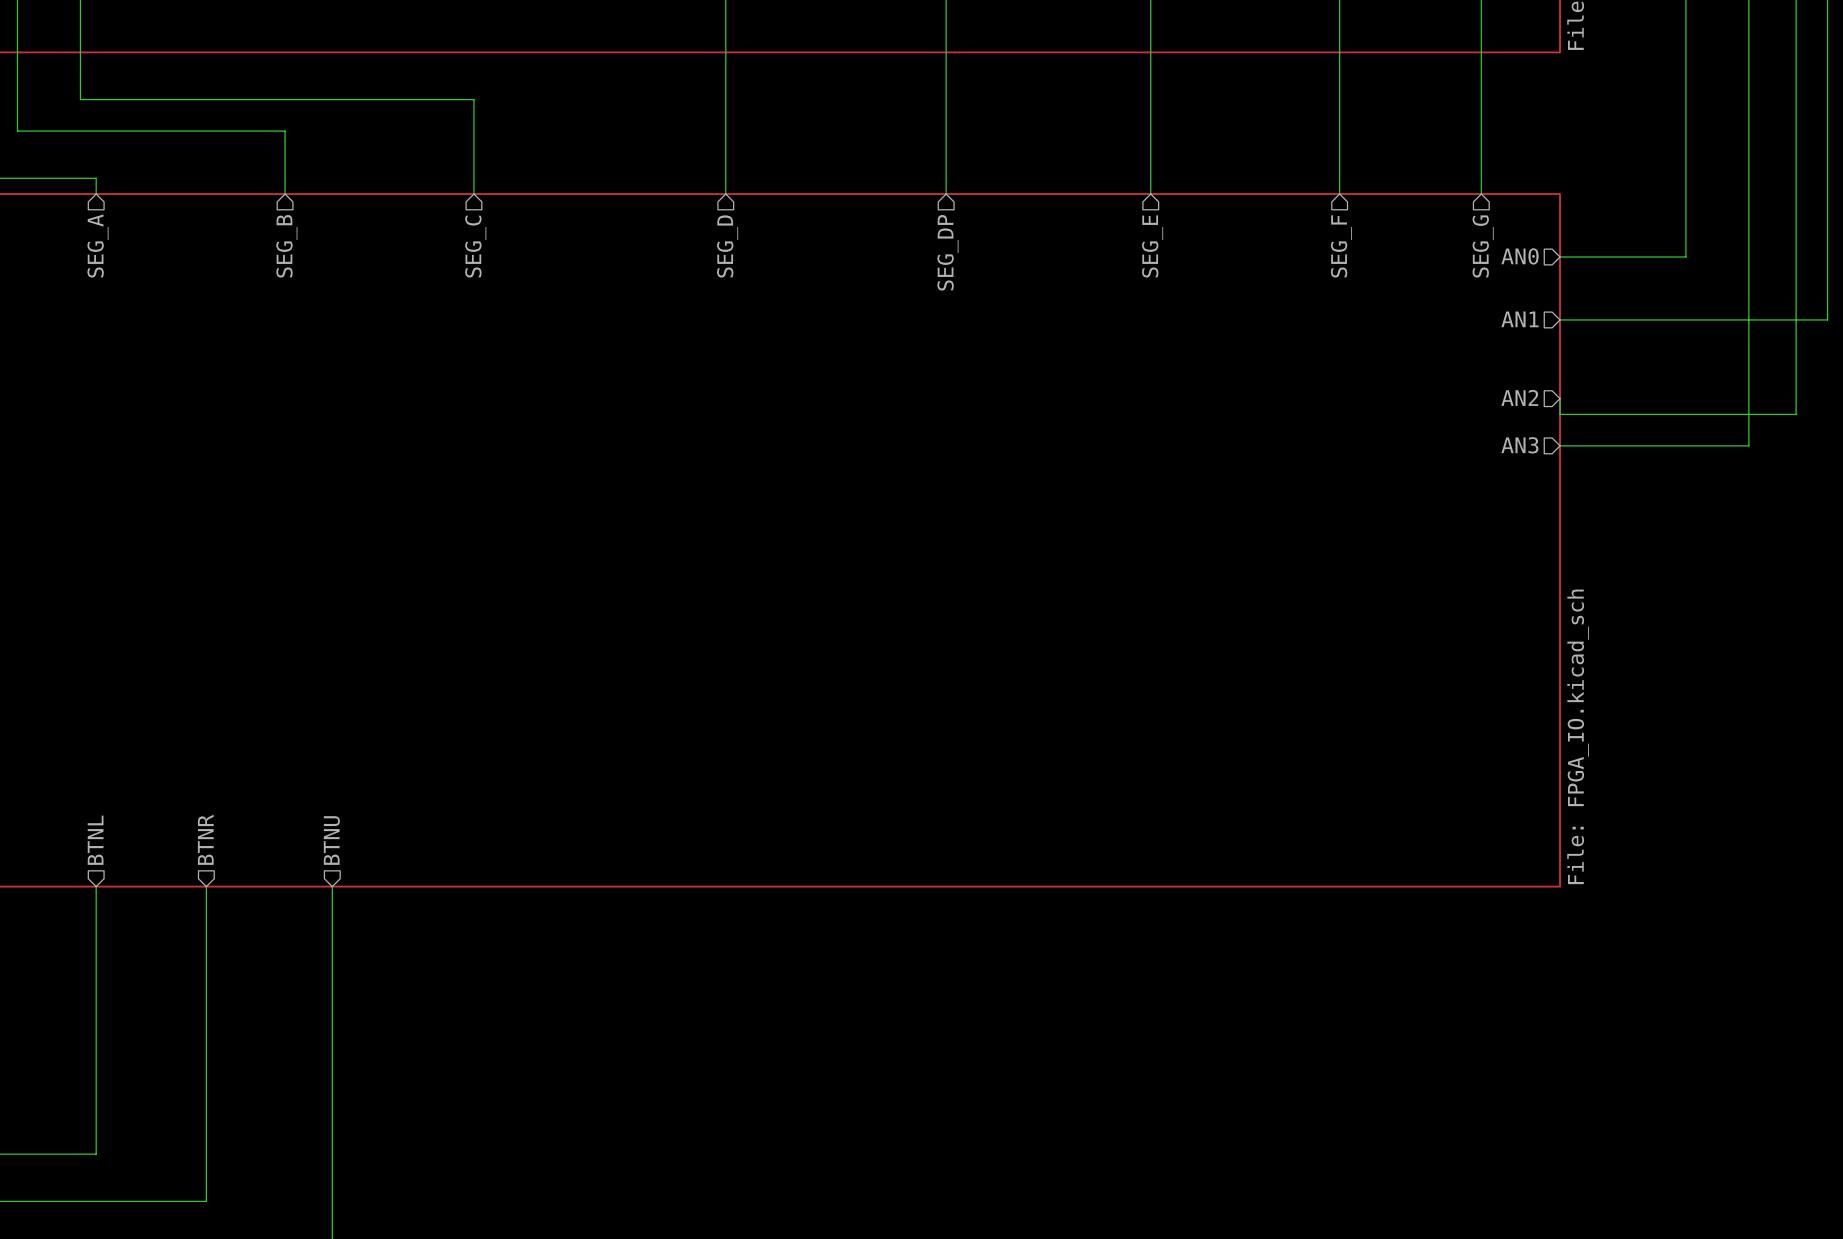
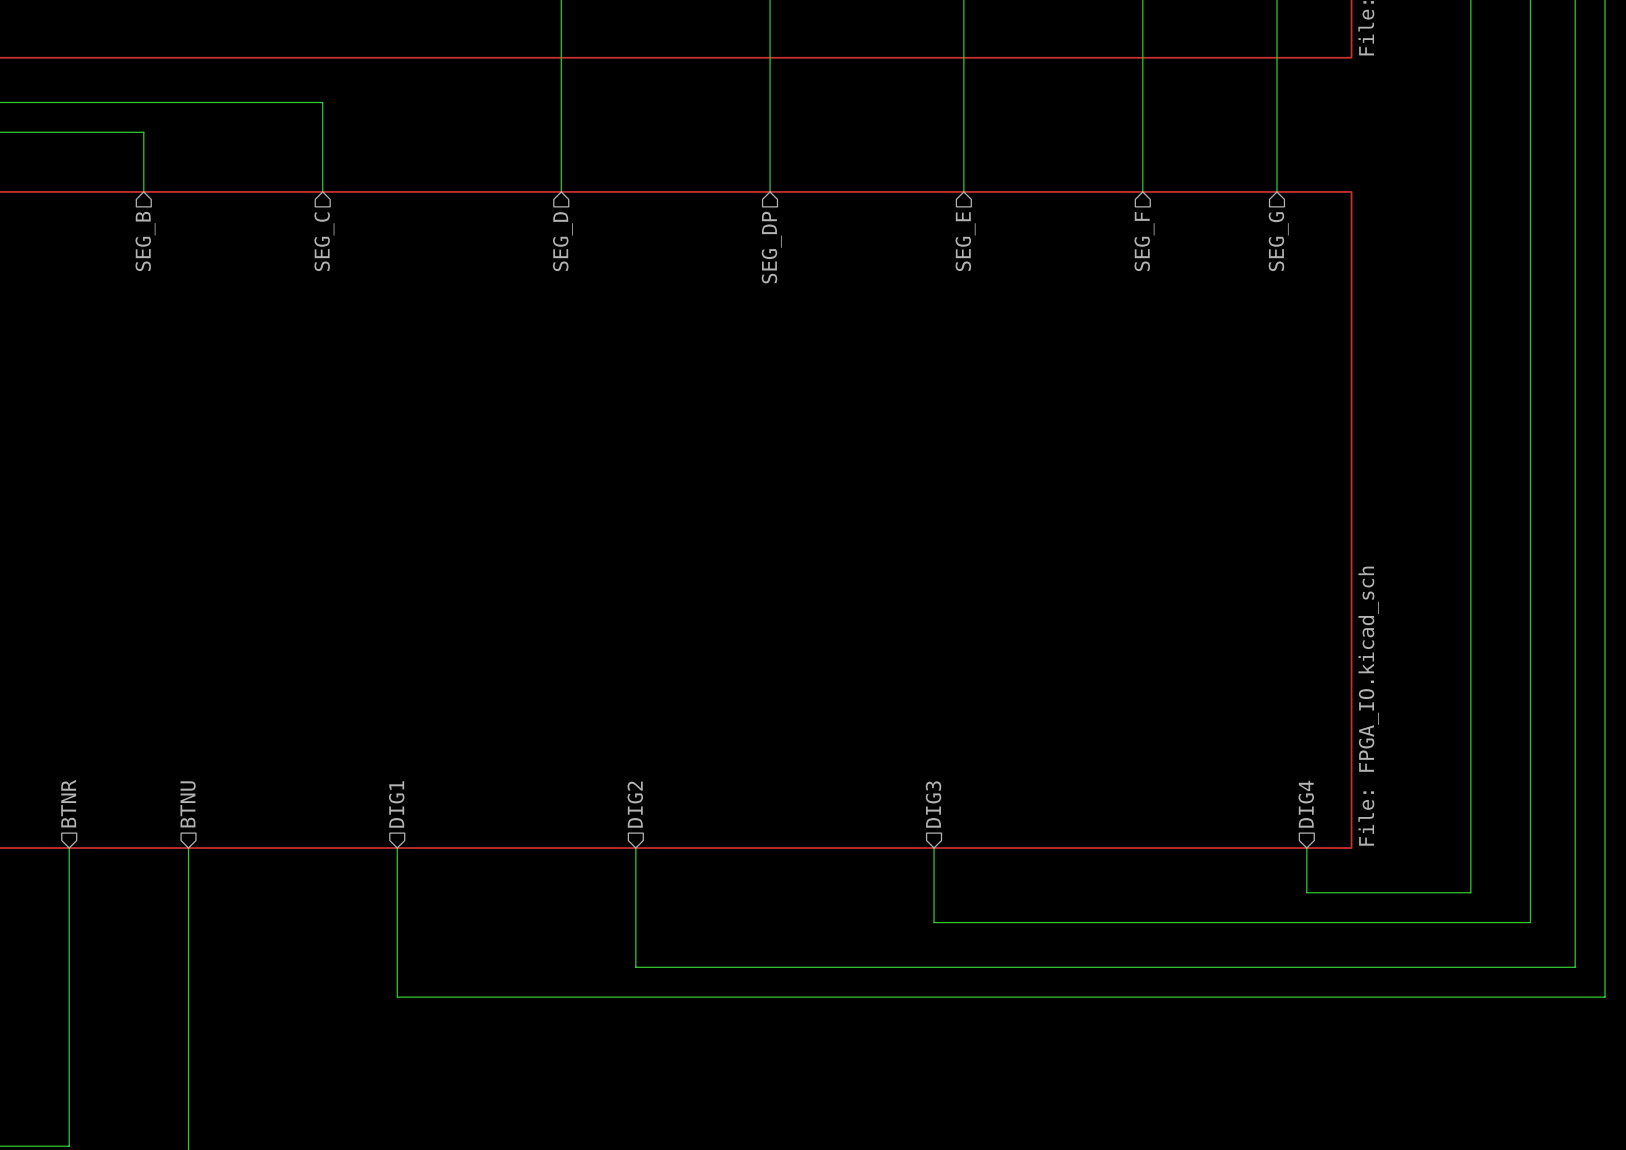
sheet pin: AN0 (1520, 256) -> none
wire: (1560, 257) (1685, 257) -> (1306, 848) (1306, 892) (1470, 892) (1470, 251)
sheet pin: AN1 (1519, 319) -> none
wire: (1560, 319) (1827, 319) -> (397, 848) (397, 997) (1605, 997) (1605, 311)
sheet pin: AN2 (1519, 397) -> none
wire: (1560, 398) (1560, 414) (1796, 414) -> (635, 848) (635, 967) (1575, 967) (1575, 400)
sheet pin: AN3 (1519, 445) -> none
wire: (1560, 445) (1748, 445) -> (934, 848) (934, 922) (1530, 922) (1530, 430)
sheet pin: none -> DIG1 (396, 804)
sheet pin: none -> DIG2 (635, 804)
sheet pin: none -> DIG3 (933, 804)
sheet pin: none -> DIG4 (1306, 804)

